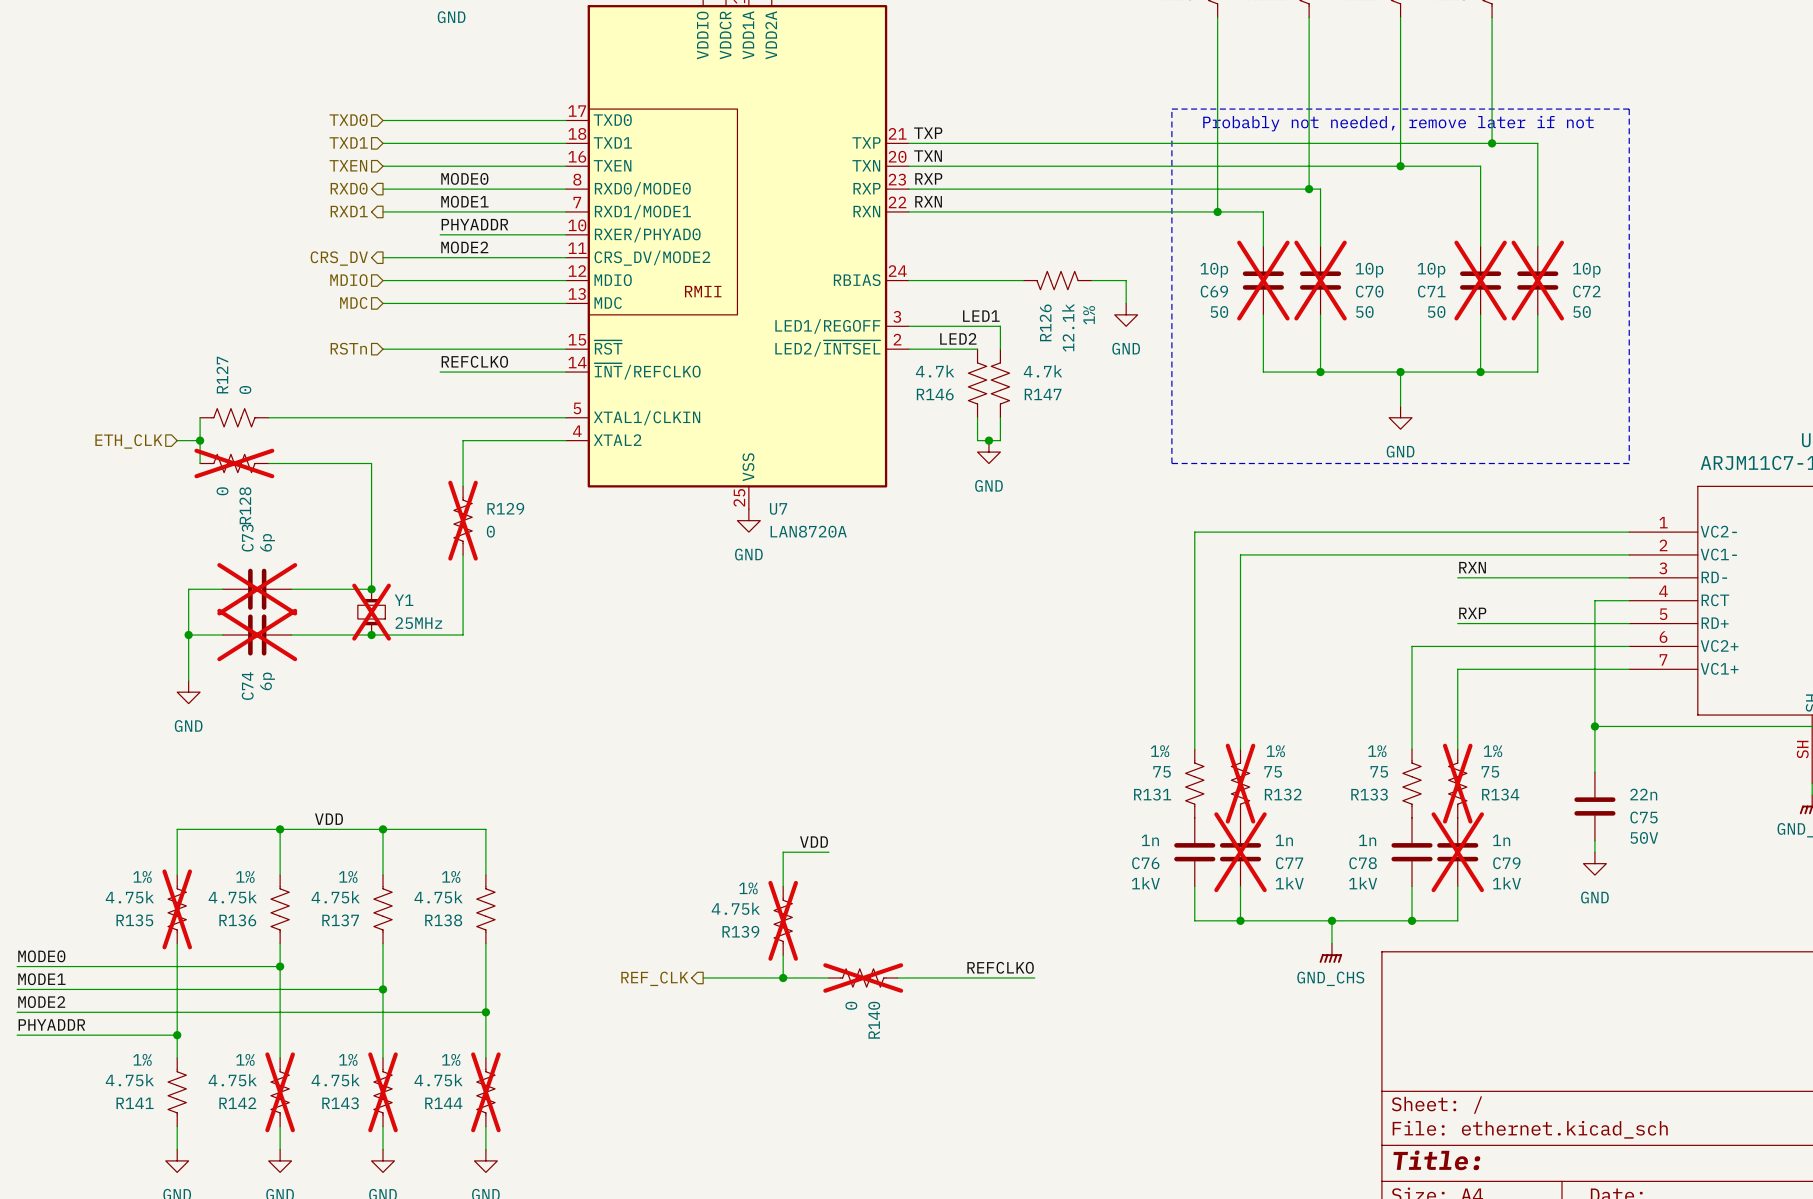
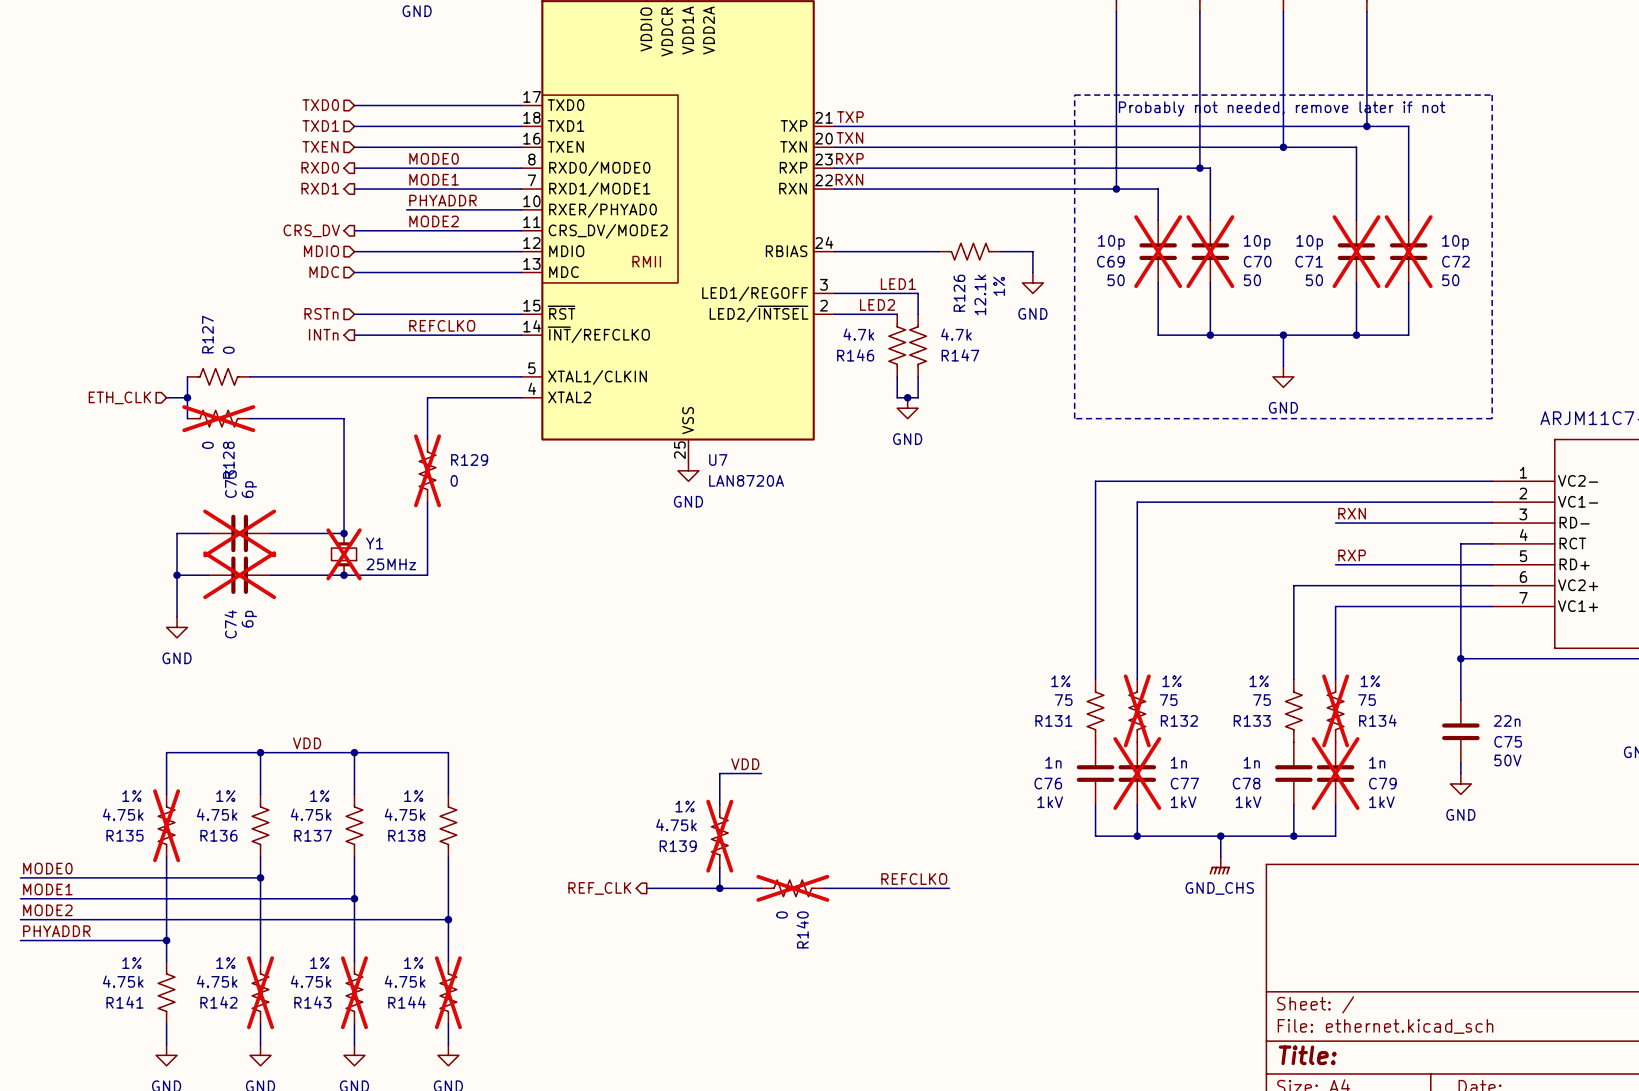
hierarchical label: none -> INTn (323, 334)
wire: none -> (354, 335) (406, 335)

